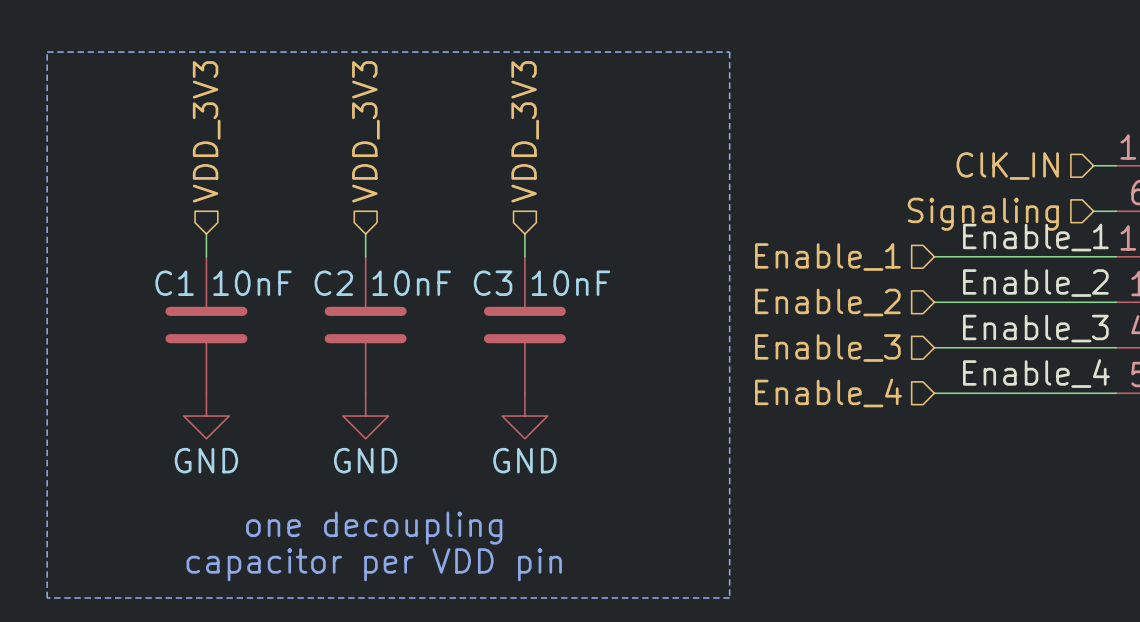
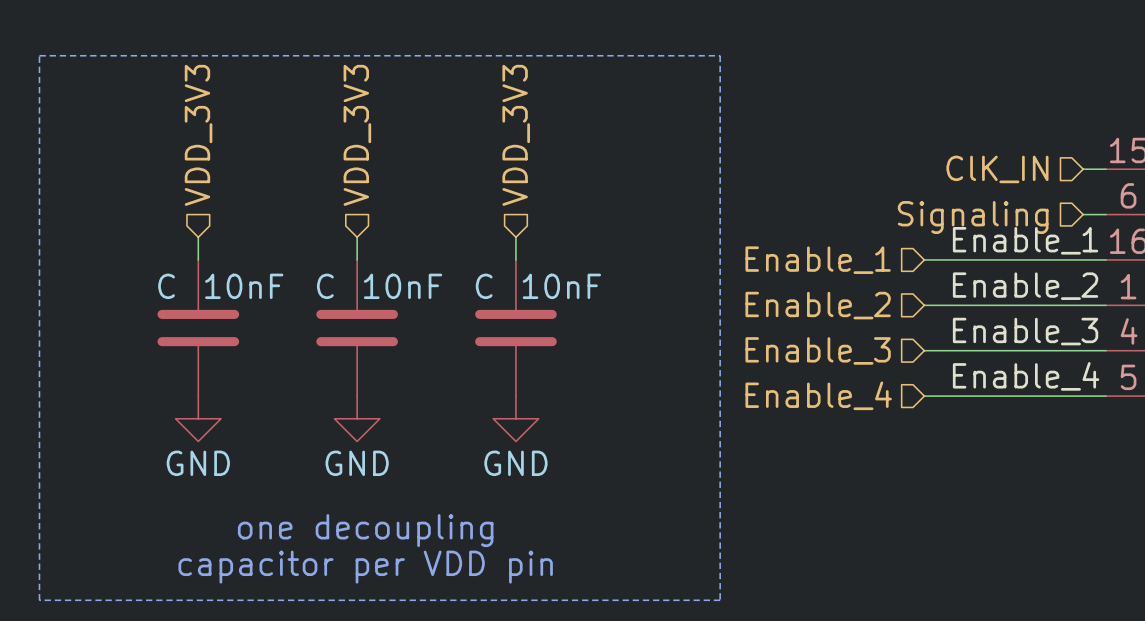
C1 name: C1 (174, 283) -> C (166, 286)
C2 name: C2 (333, 283) -> C (325, 286)
C3 name: C3 (493, 283) -> C (484, 286)

